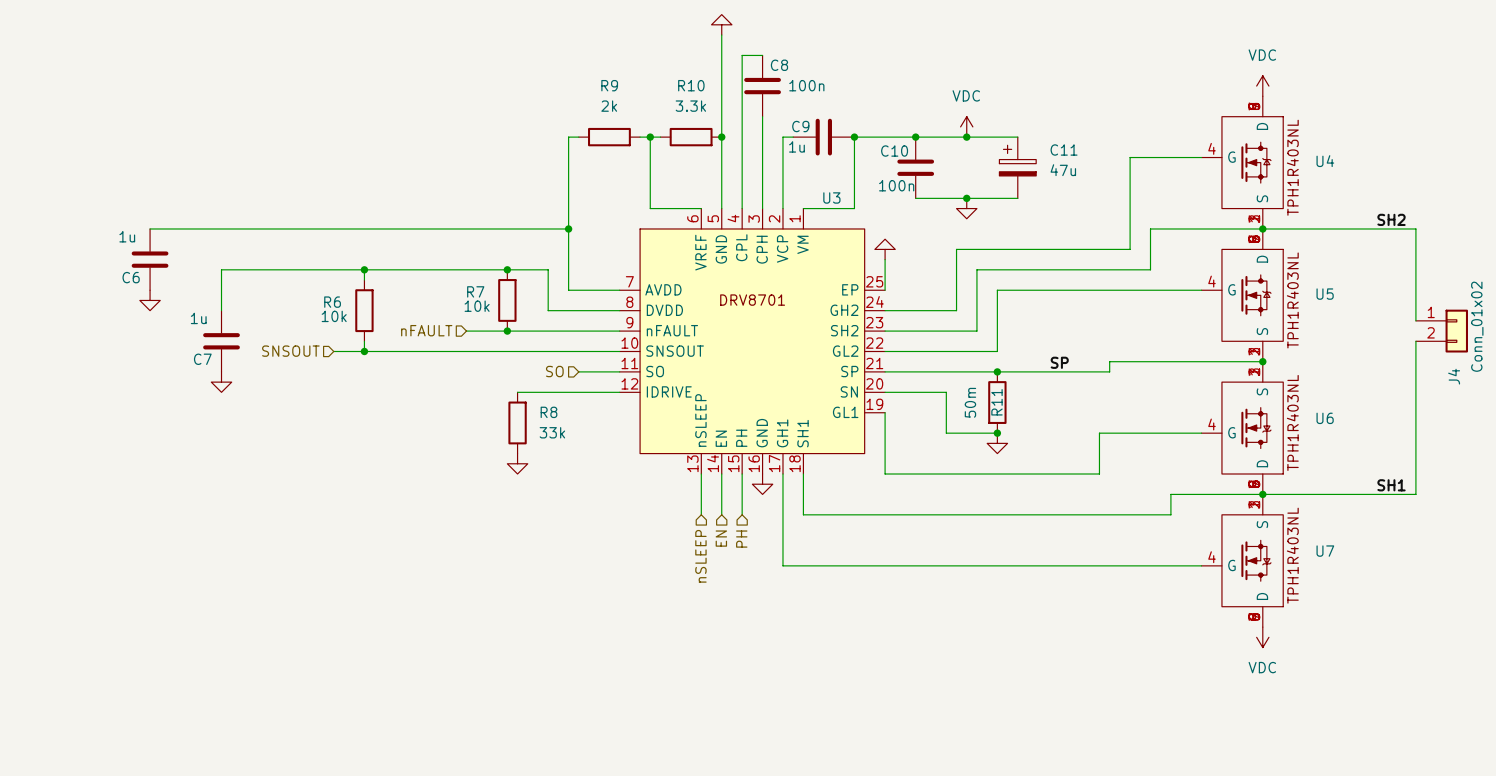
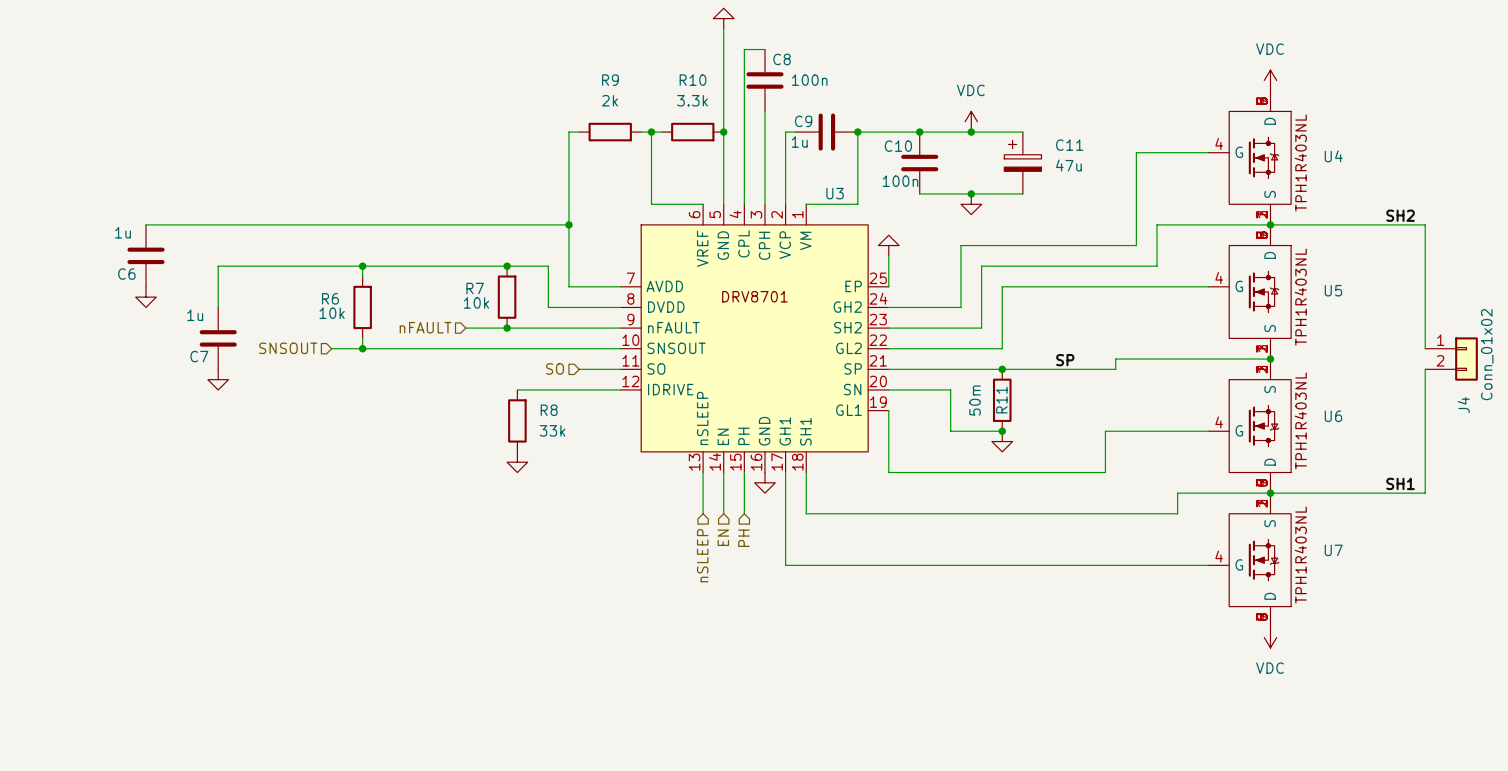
J4 position: (1441, 331) -> (1451, 359)
wire: (1415, 351) (1415, 371) -> (1425, 317) (1425, 338)

